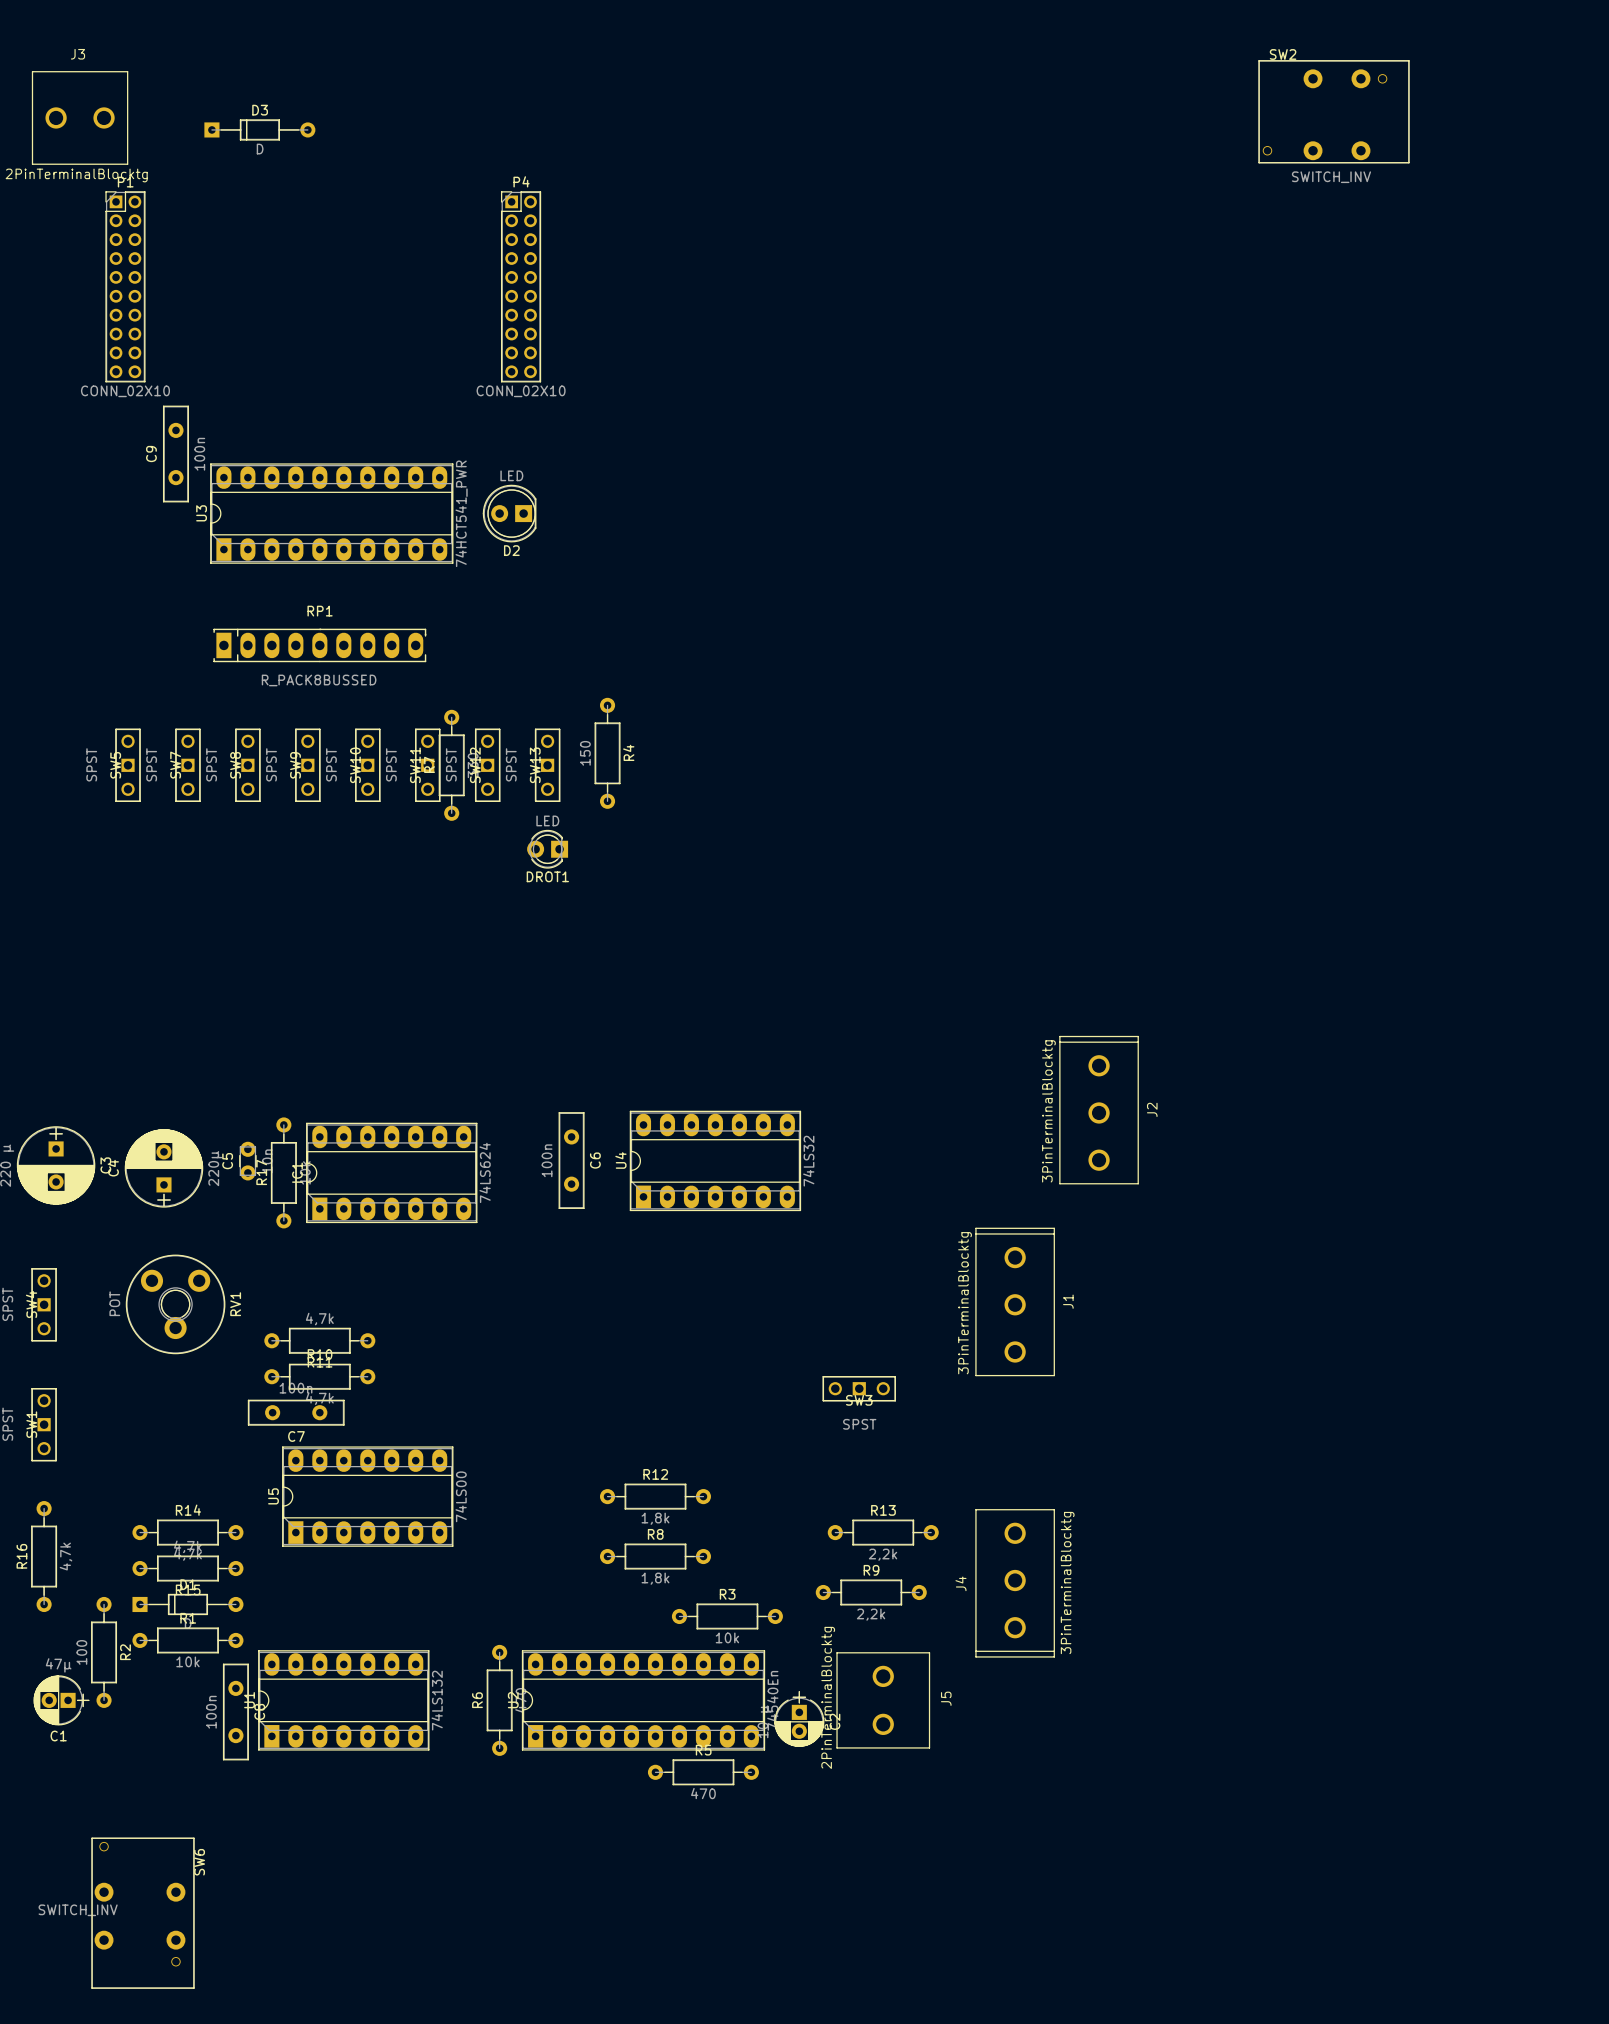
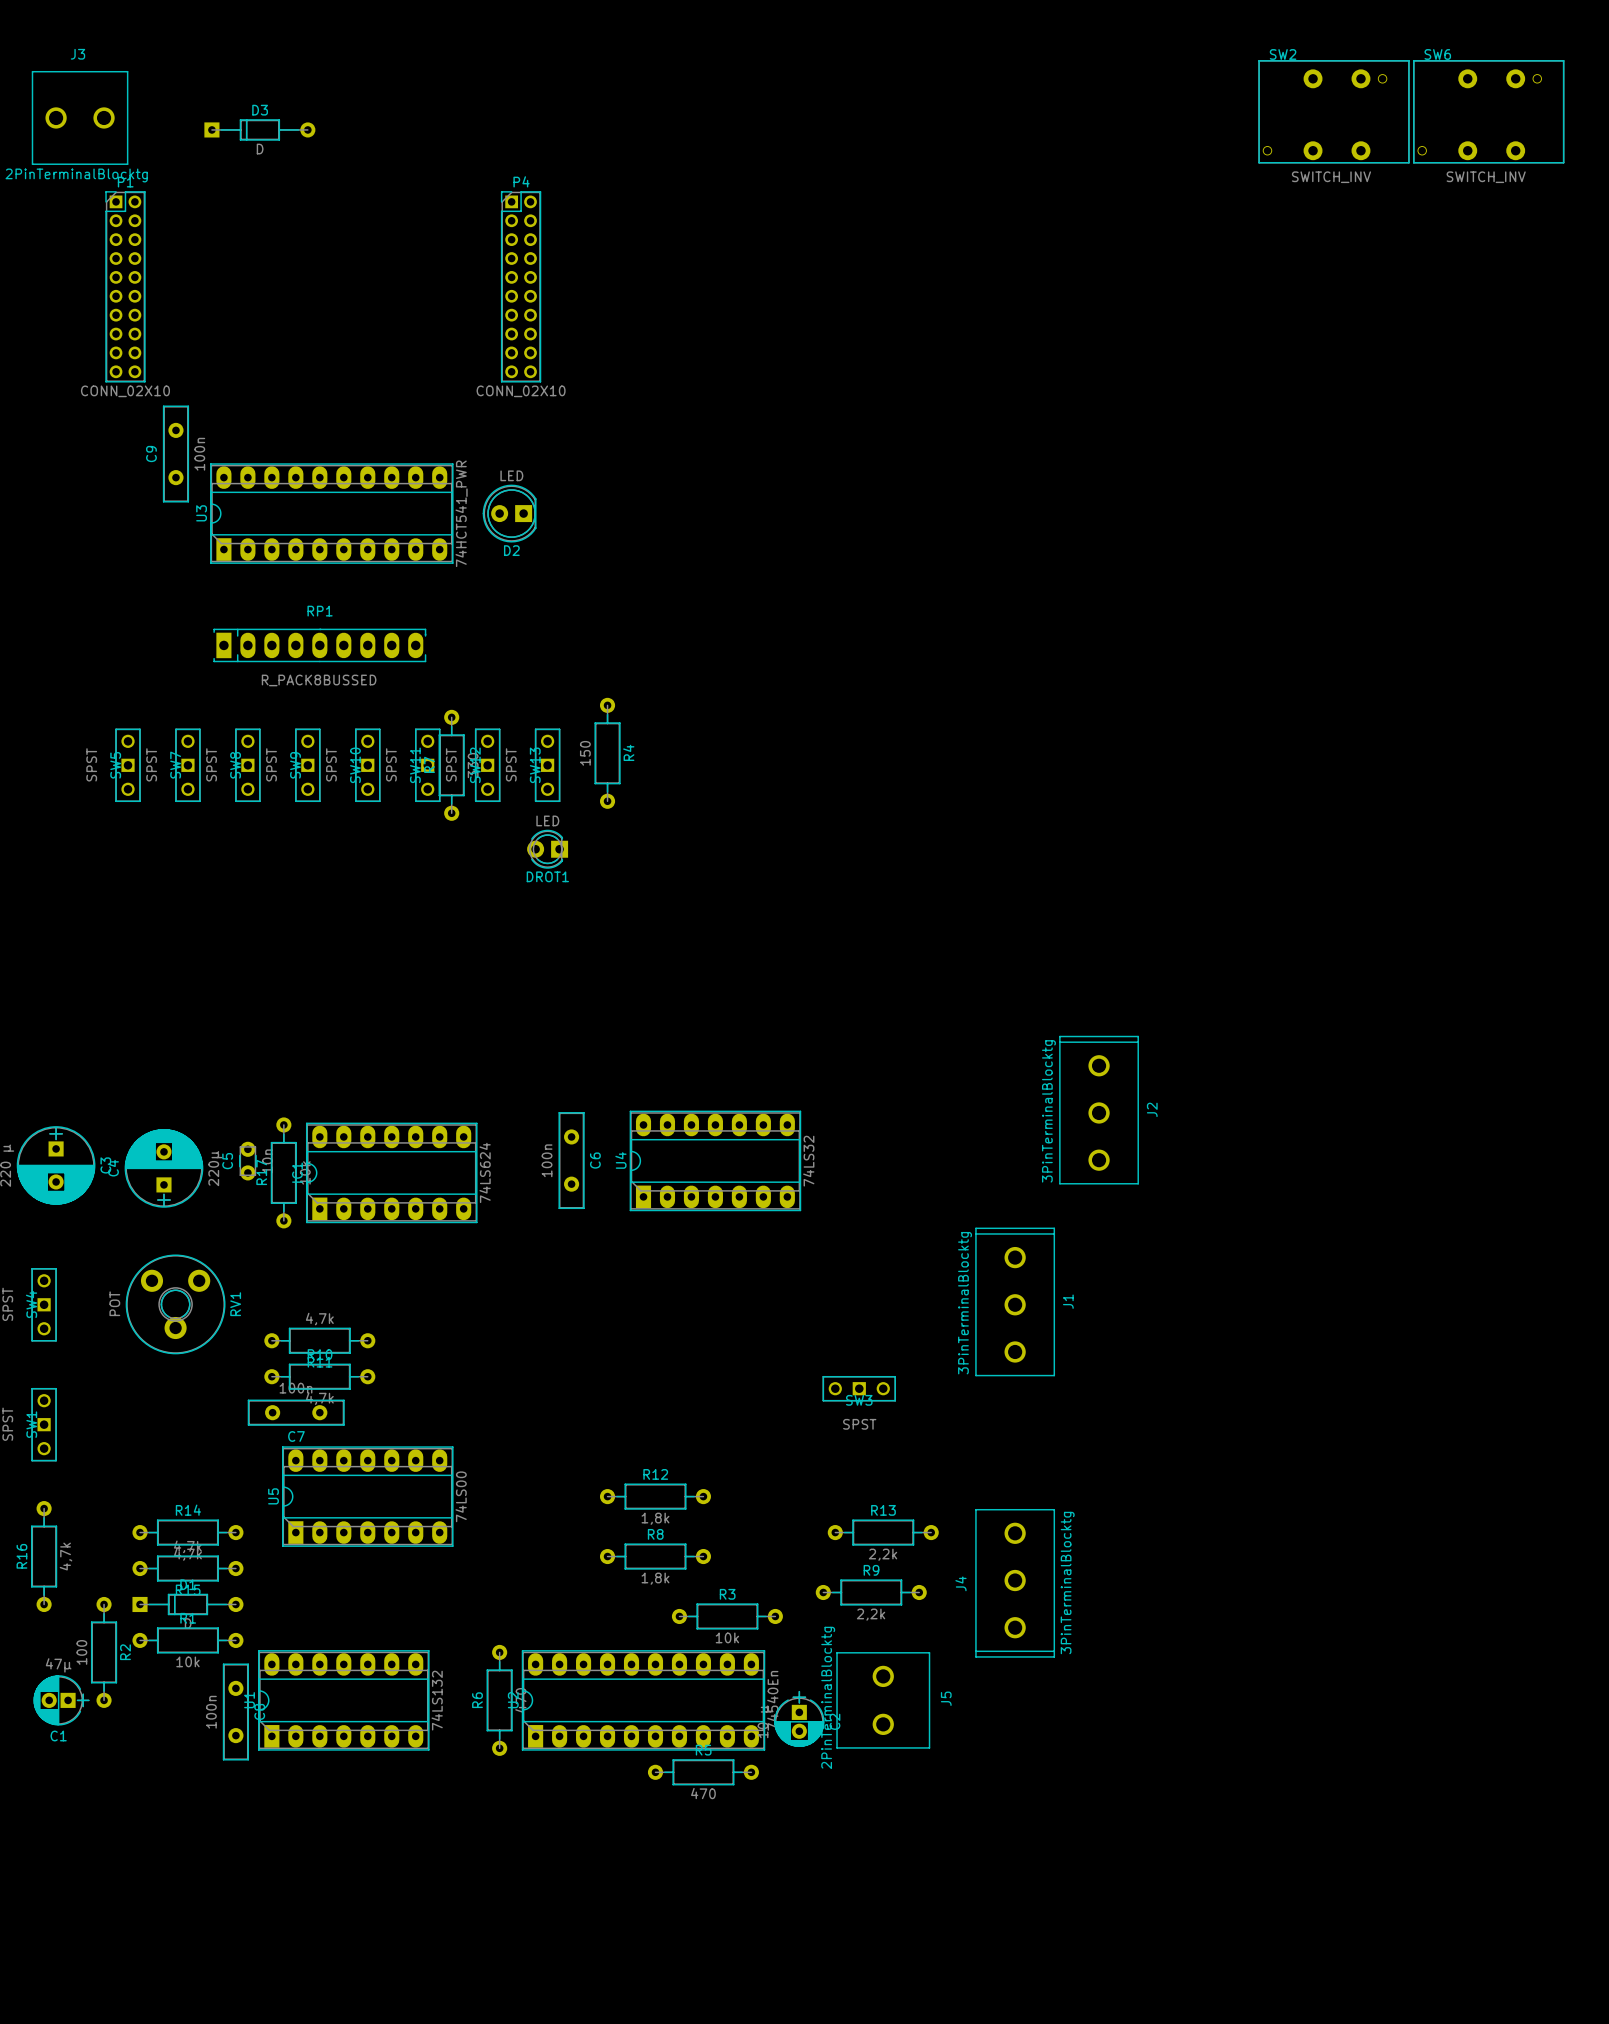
SW6 rotation: 0° (143, 1913) -> 90° counterclockwise (1488, 111)
SW6 position: (143, 1913) -> (1488, 111)

